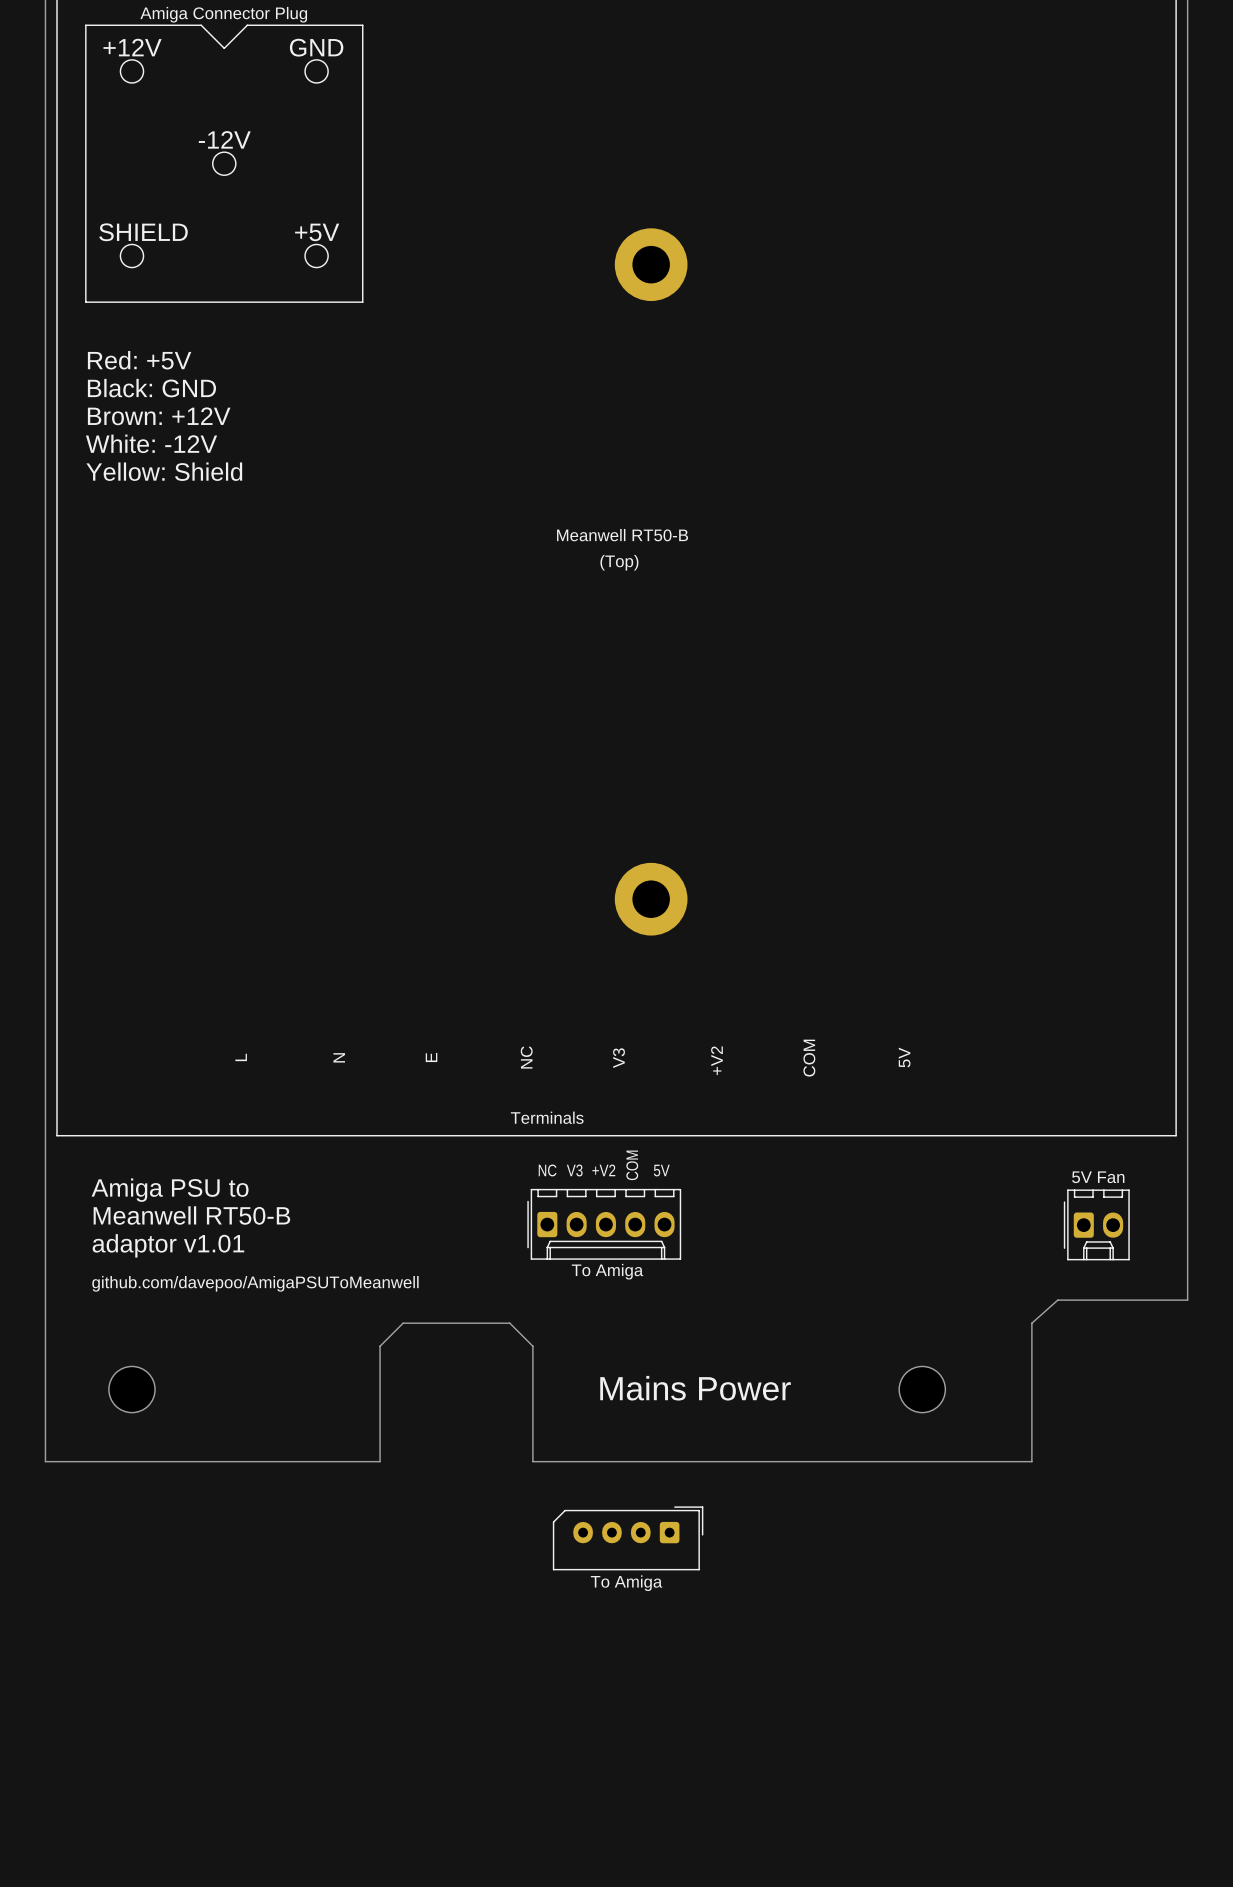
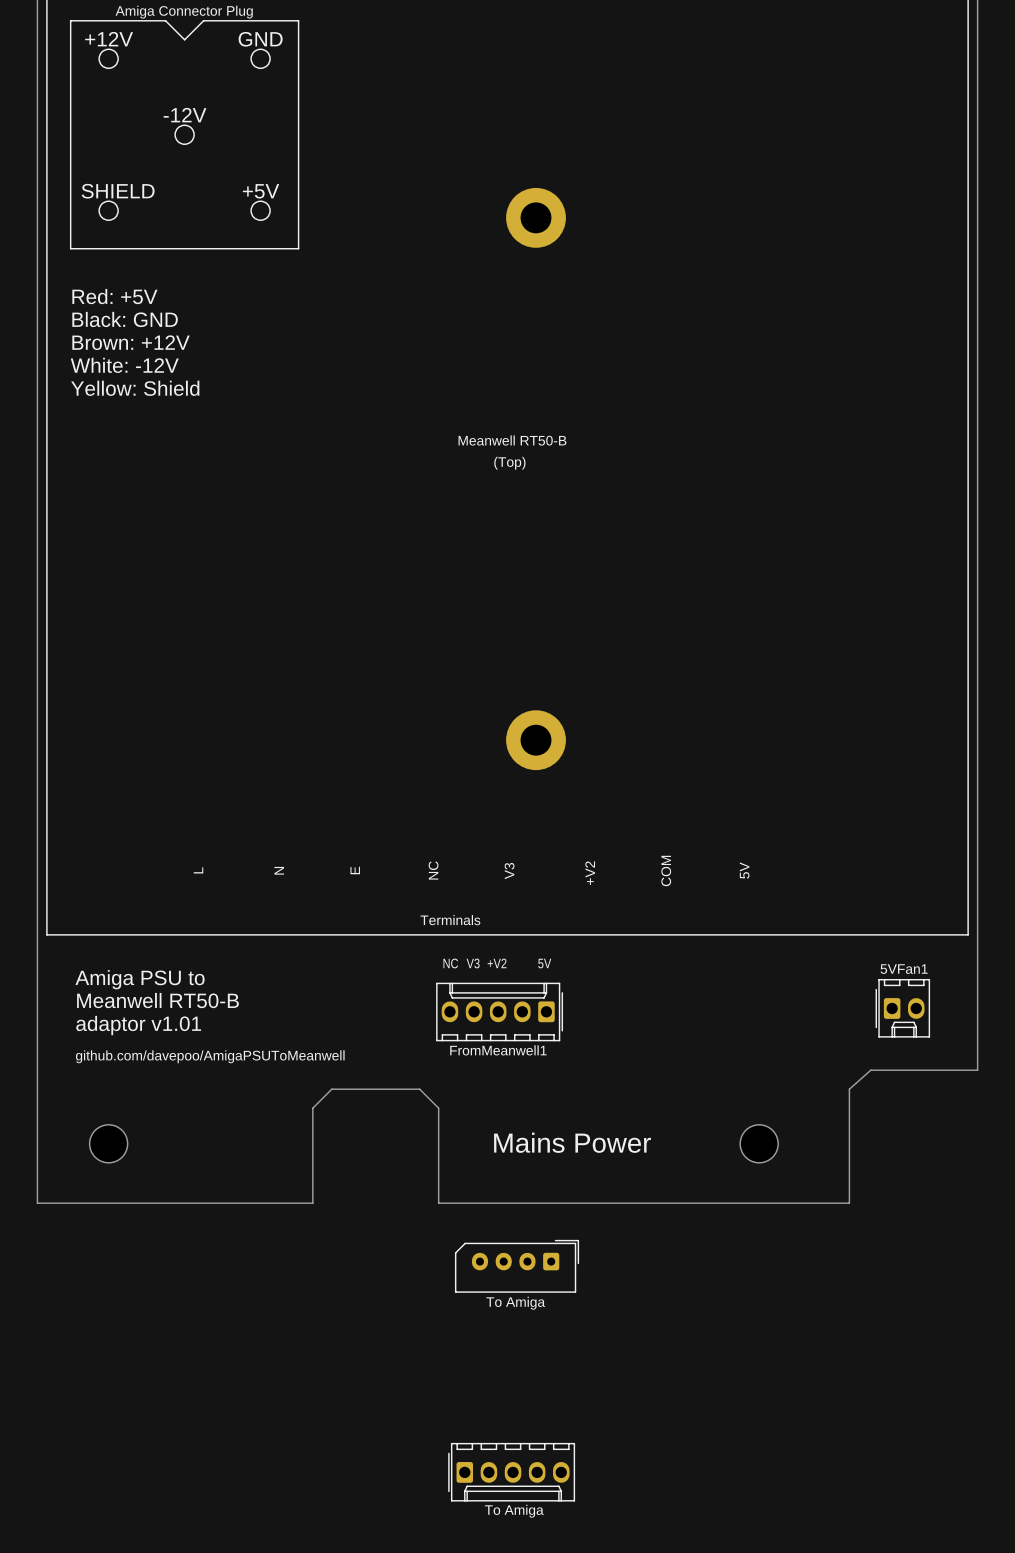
text: COM (632, 1165) -> none
5V Fan name: 5V Fan (1098, 1177) -> 5VFan1 (904, 969)
To Amiga: (604, 1224) -> none
FromMeanwell1: none -> (499, 1011)
To Amiga: none -> (511, 1472)

